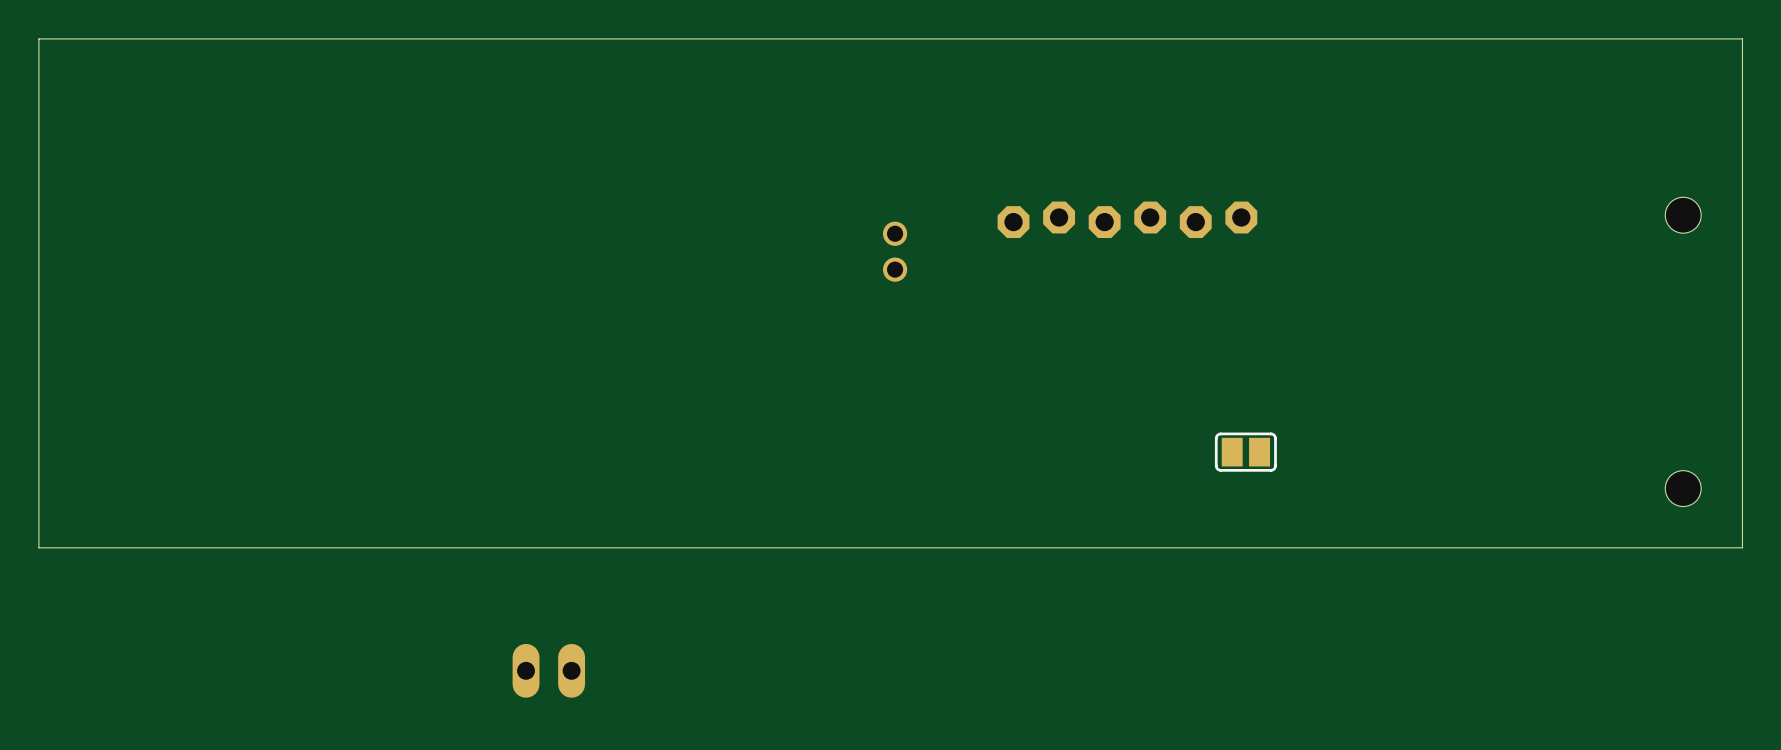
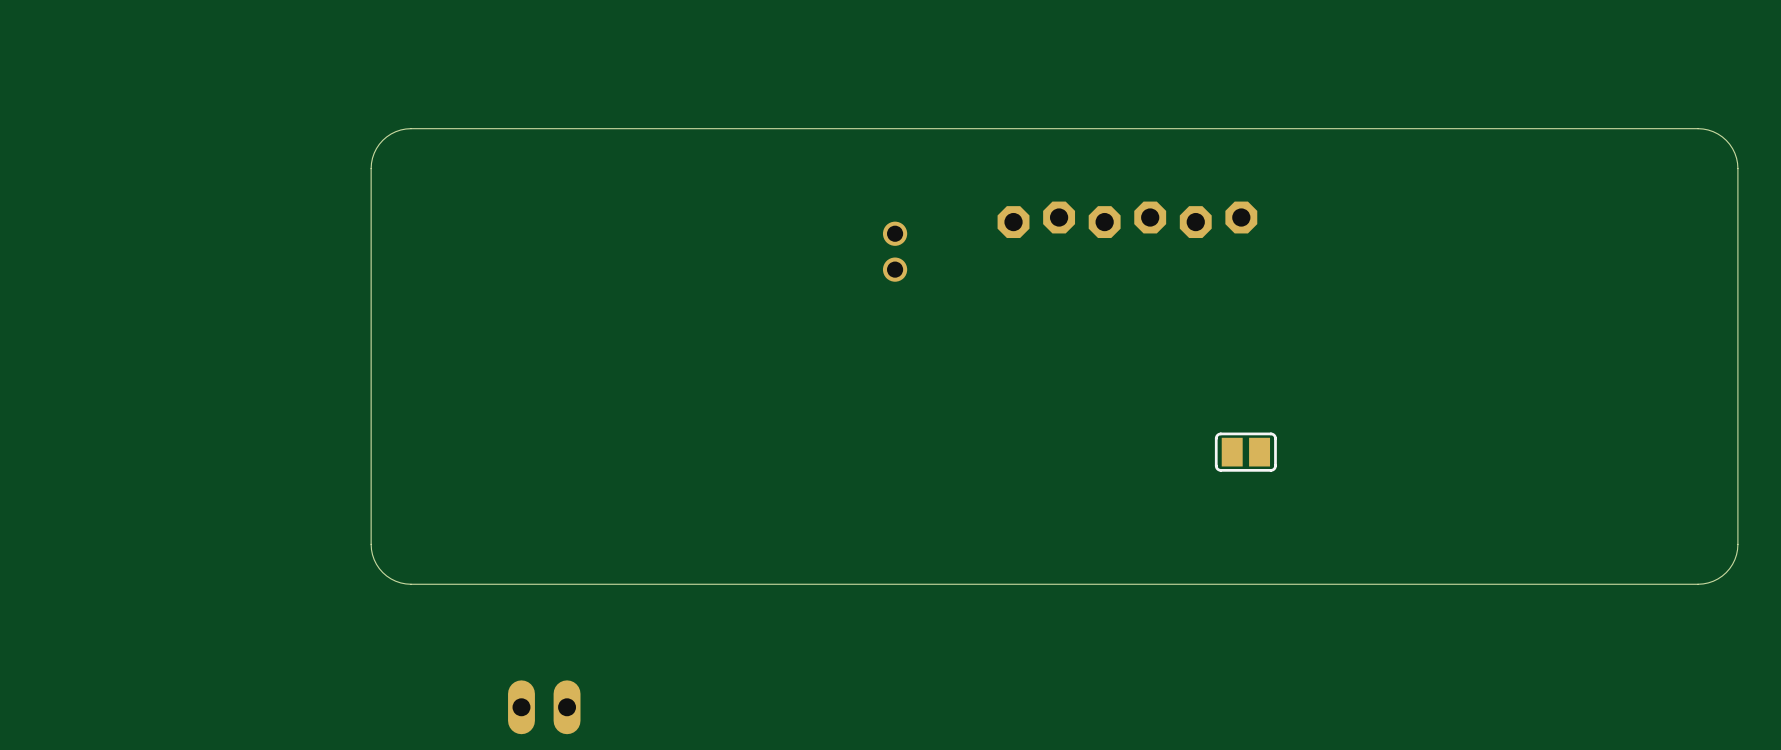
board edge: (1742, 38) (38, 38) (38, 547) (1742, 547) (1742, 38) -> (1698, 128) (1713, 131) (1726, 140) (1734, 153) (1737, 168) (1737, 549) (1729, 568) (1717, 578) (1708, 582) (411, 584) (400, 582) (386, 576) (376, 564) (372, 554) (371, 163) (379, 144) (391, 134) (400, 130) (1698, 128)
hole: (1683, 215) -> none
hole: (1683, 488) -> none
part position: (548, 670) -> (544, 707)

